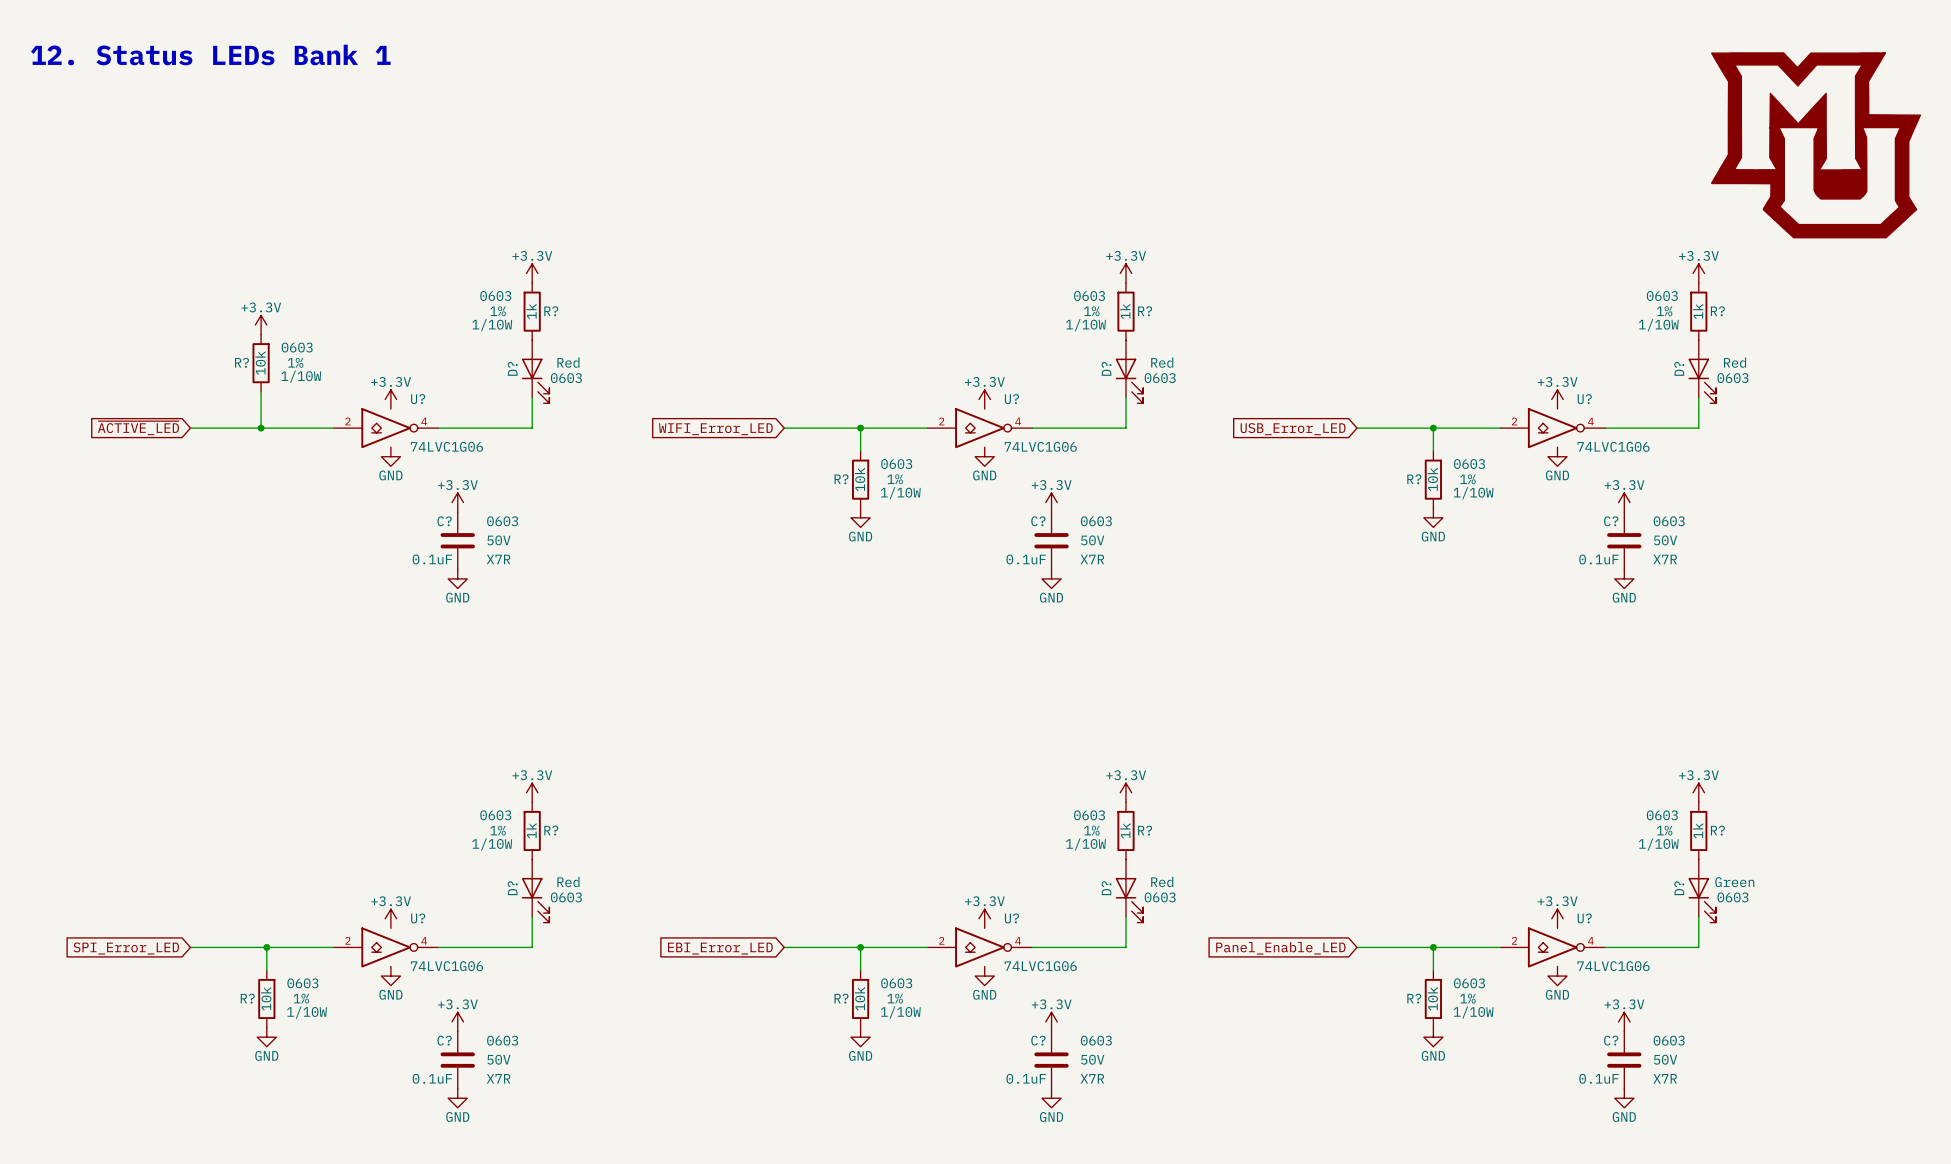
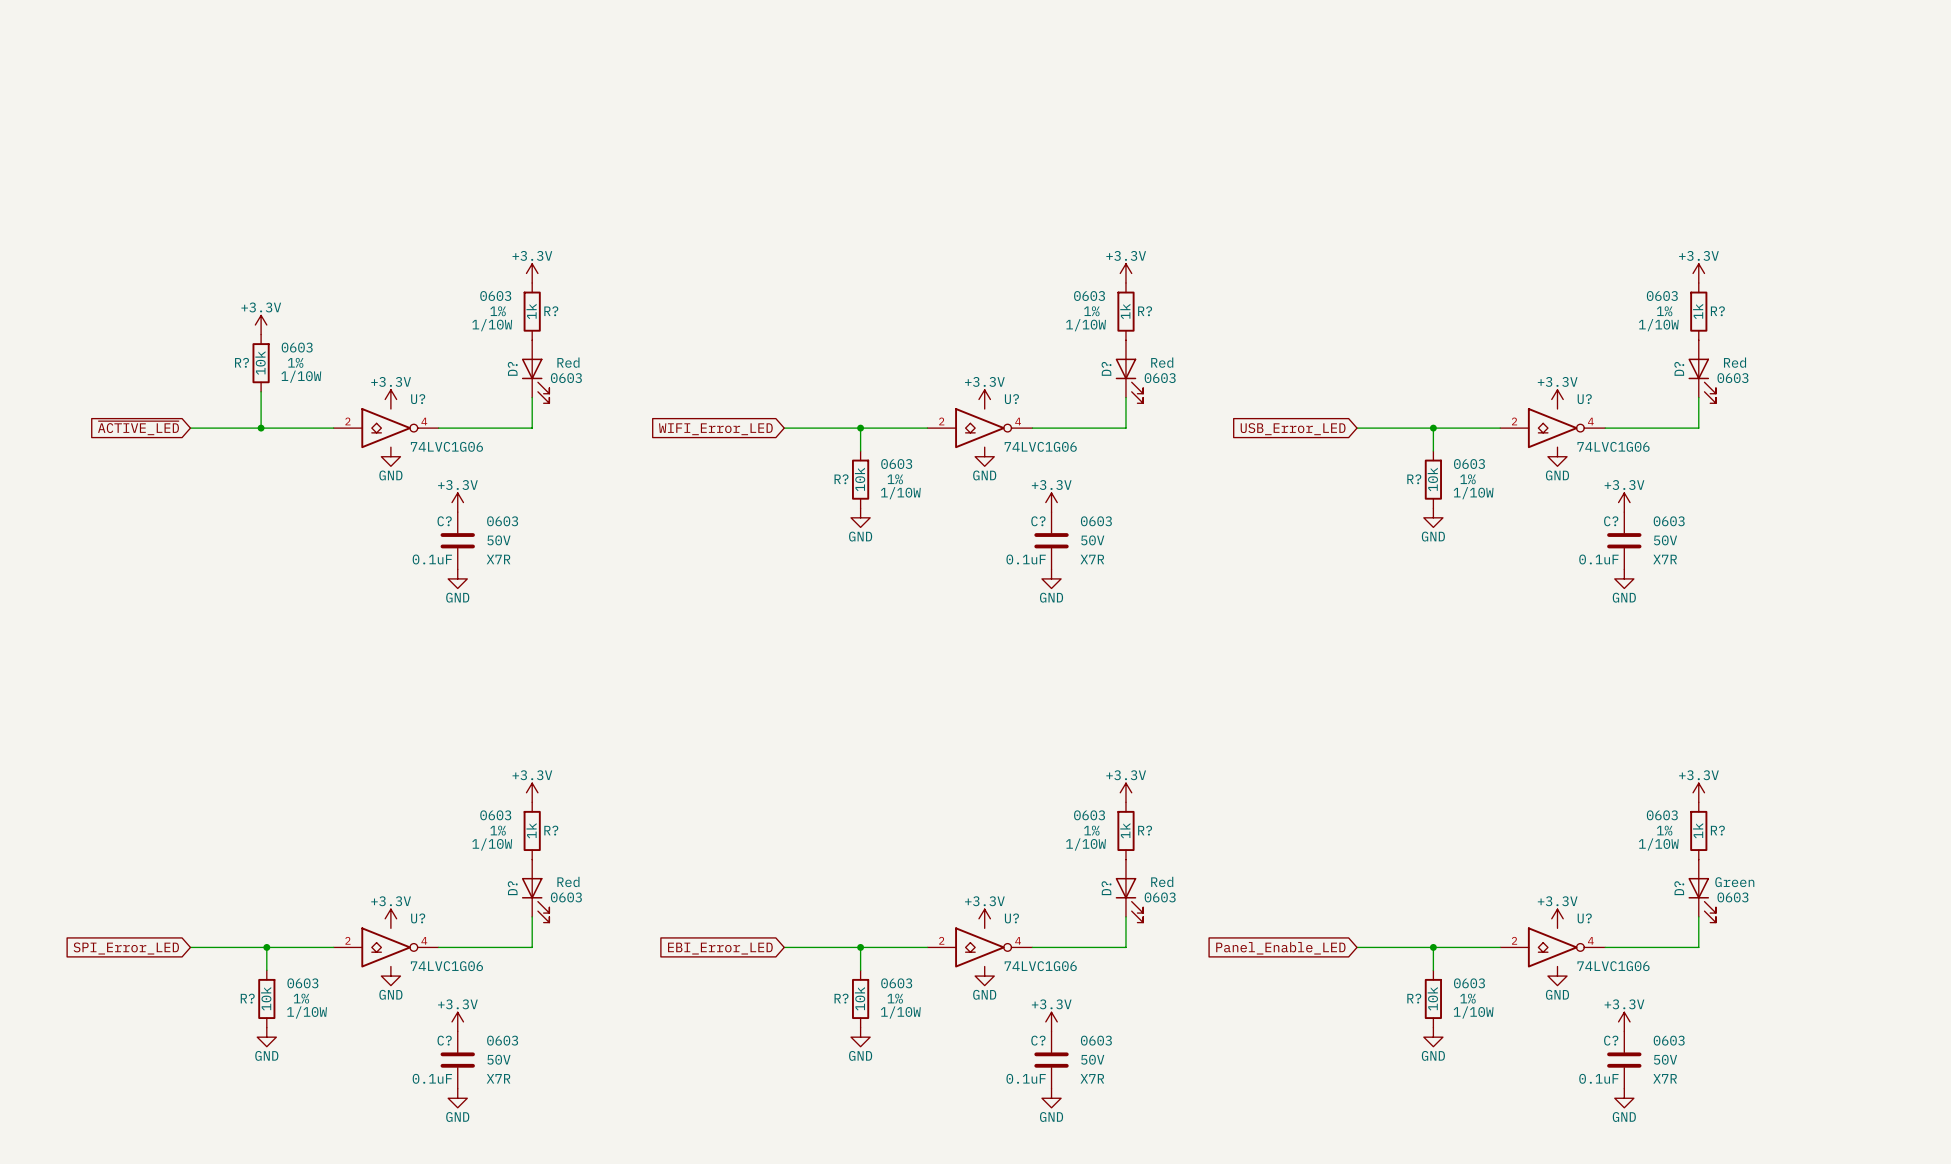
text: 12. Status LEDs Bank 1 (210, 54) -> none
power symbol: (1816, 145) -> none

